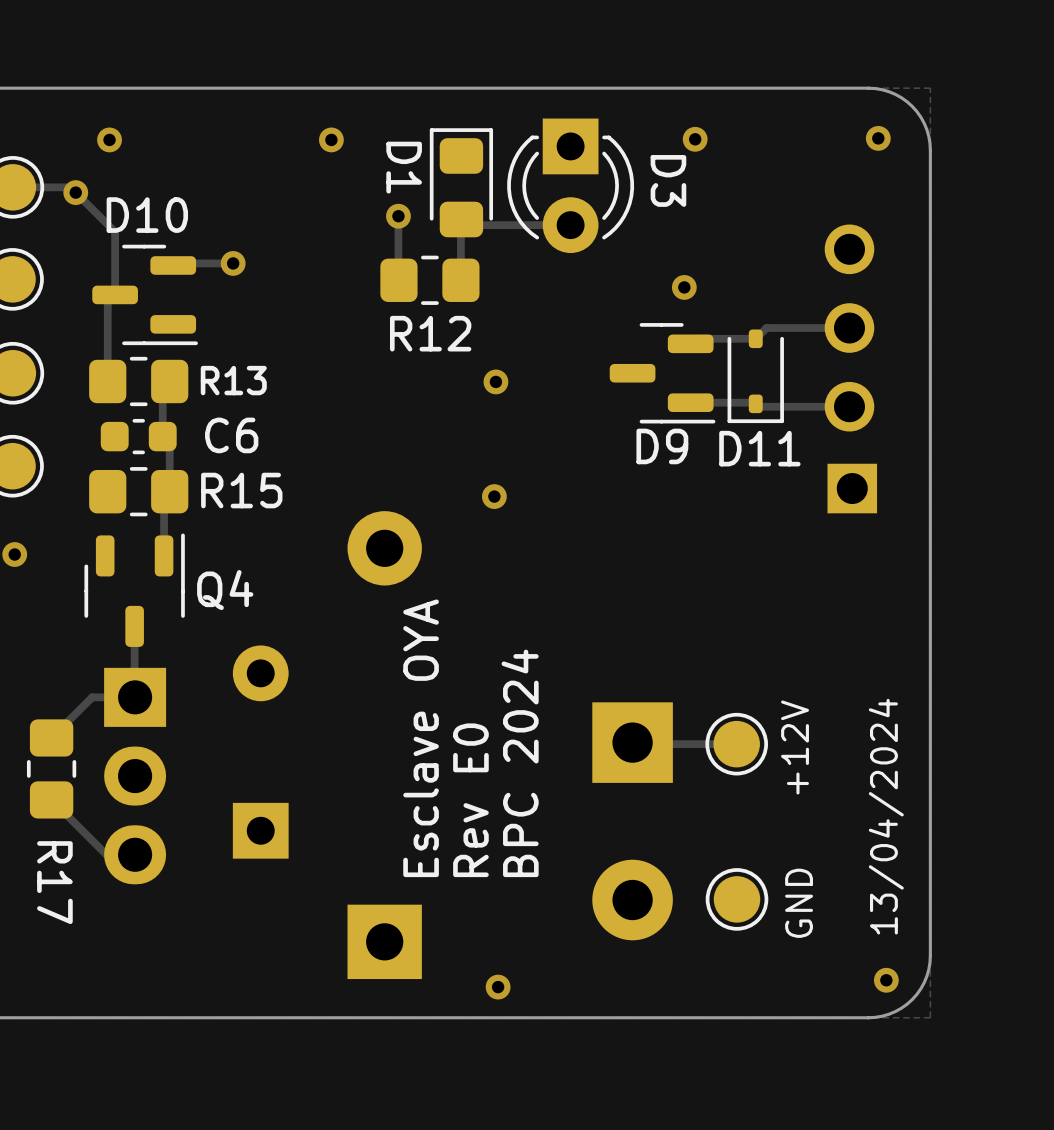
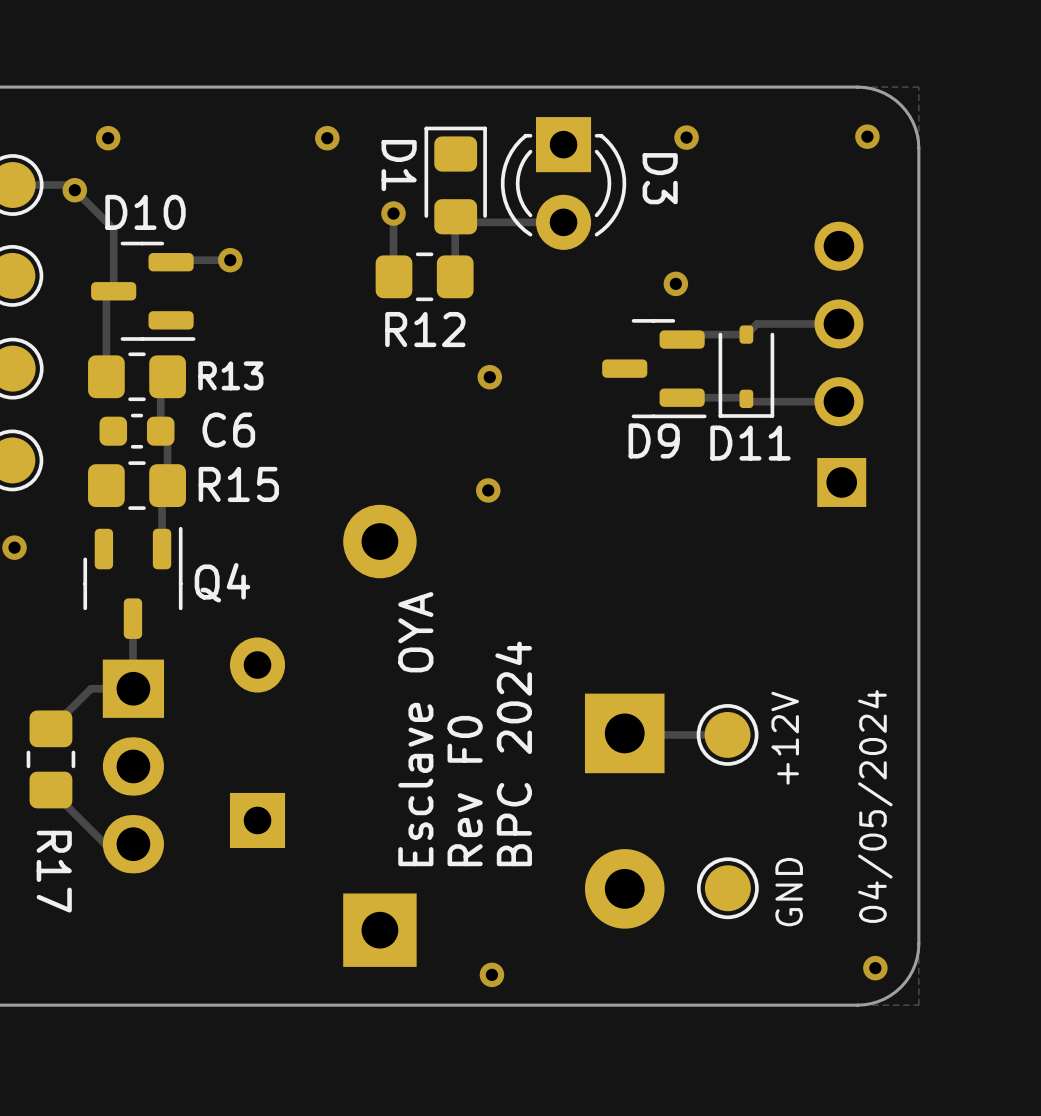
text: Rev E0 (470, 800) -> Rev F0 (465, 791)
text: 13/04/2024 (886, 816) -> 04/05/2024 (875, 806)

